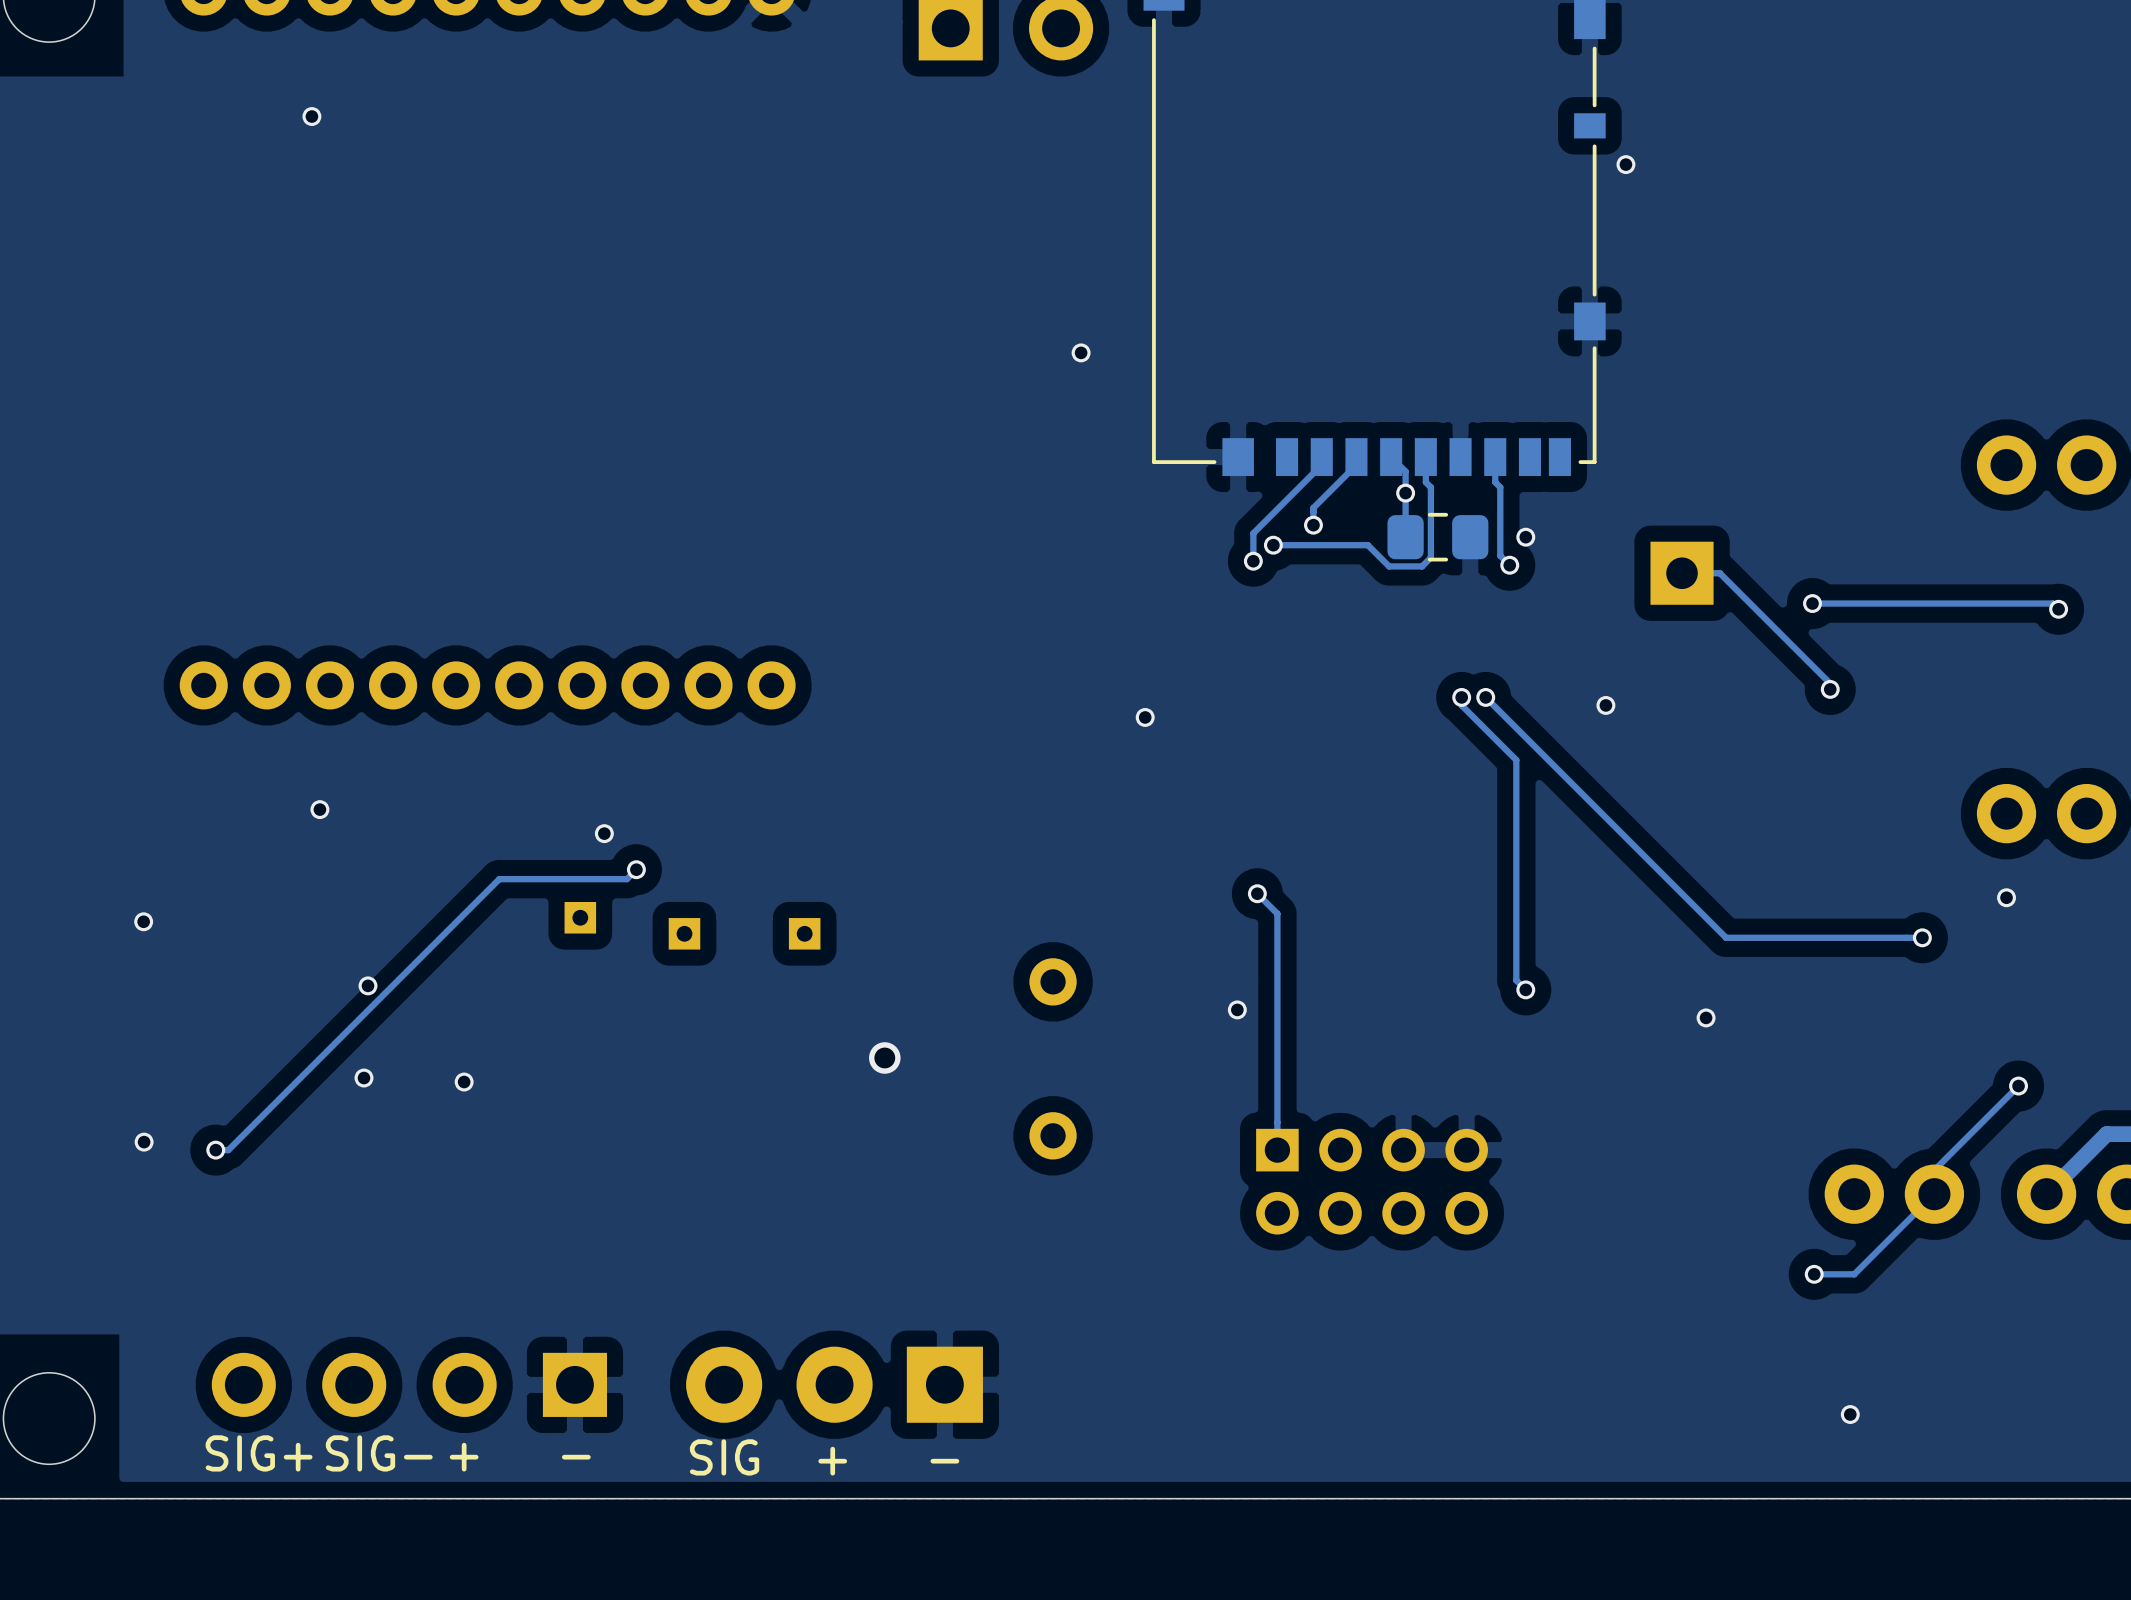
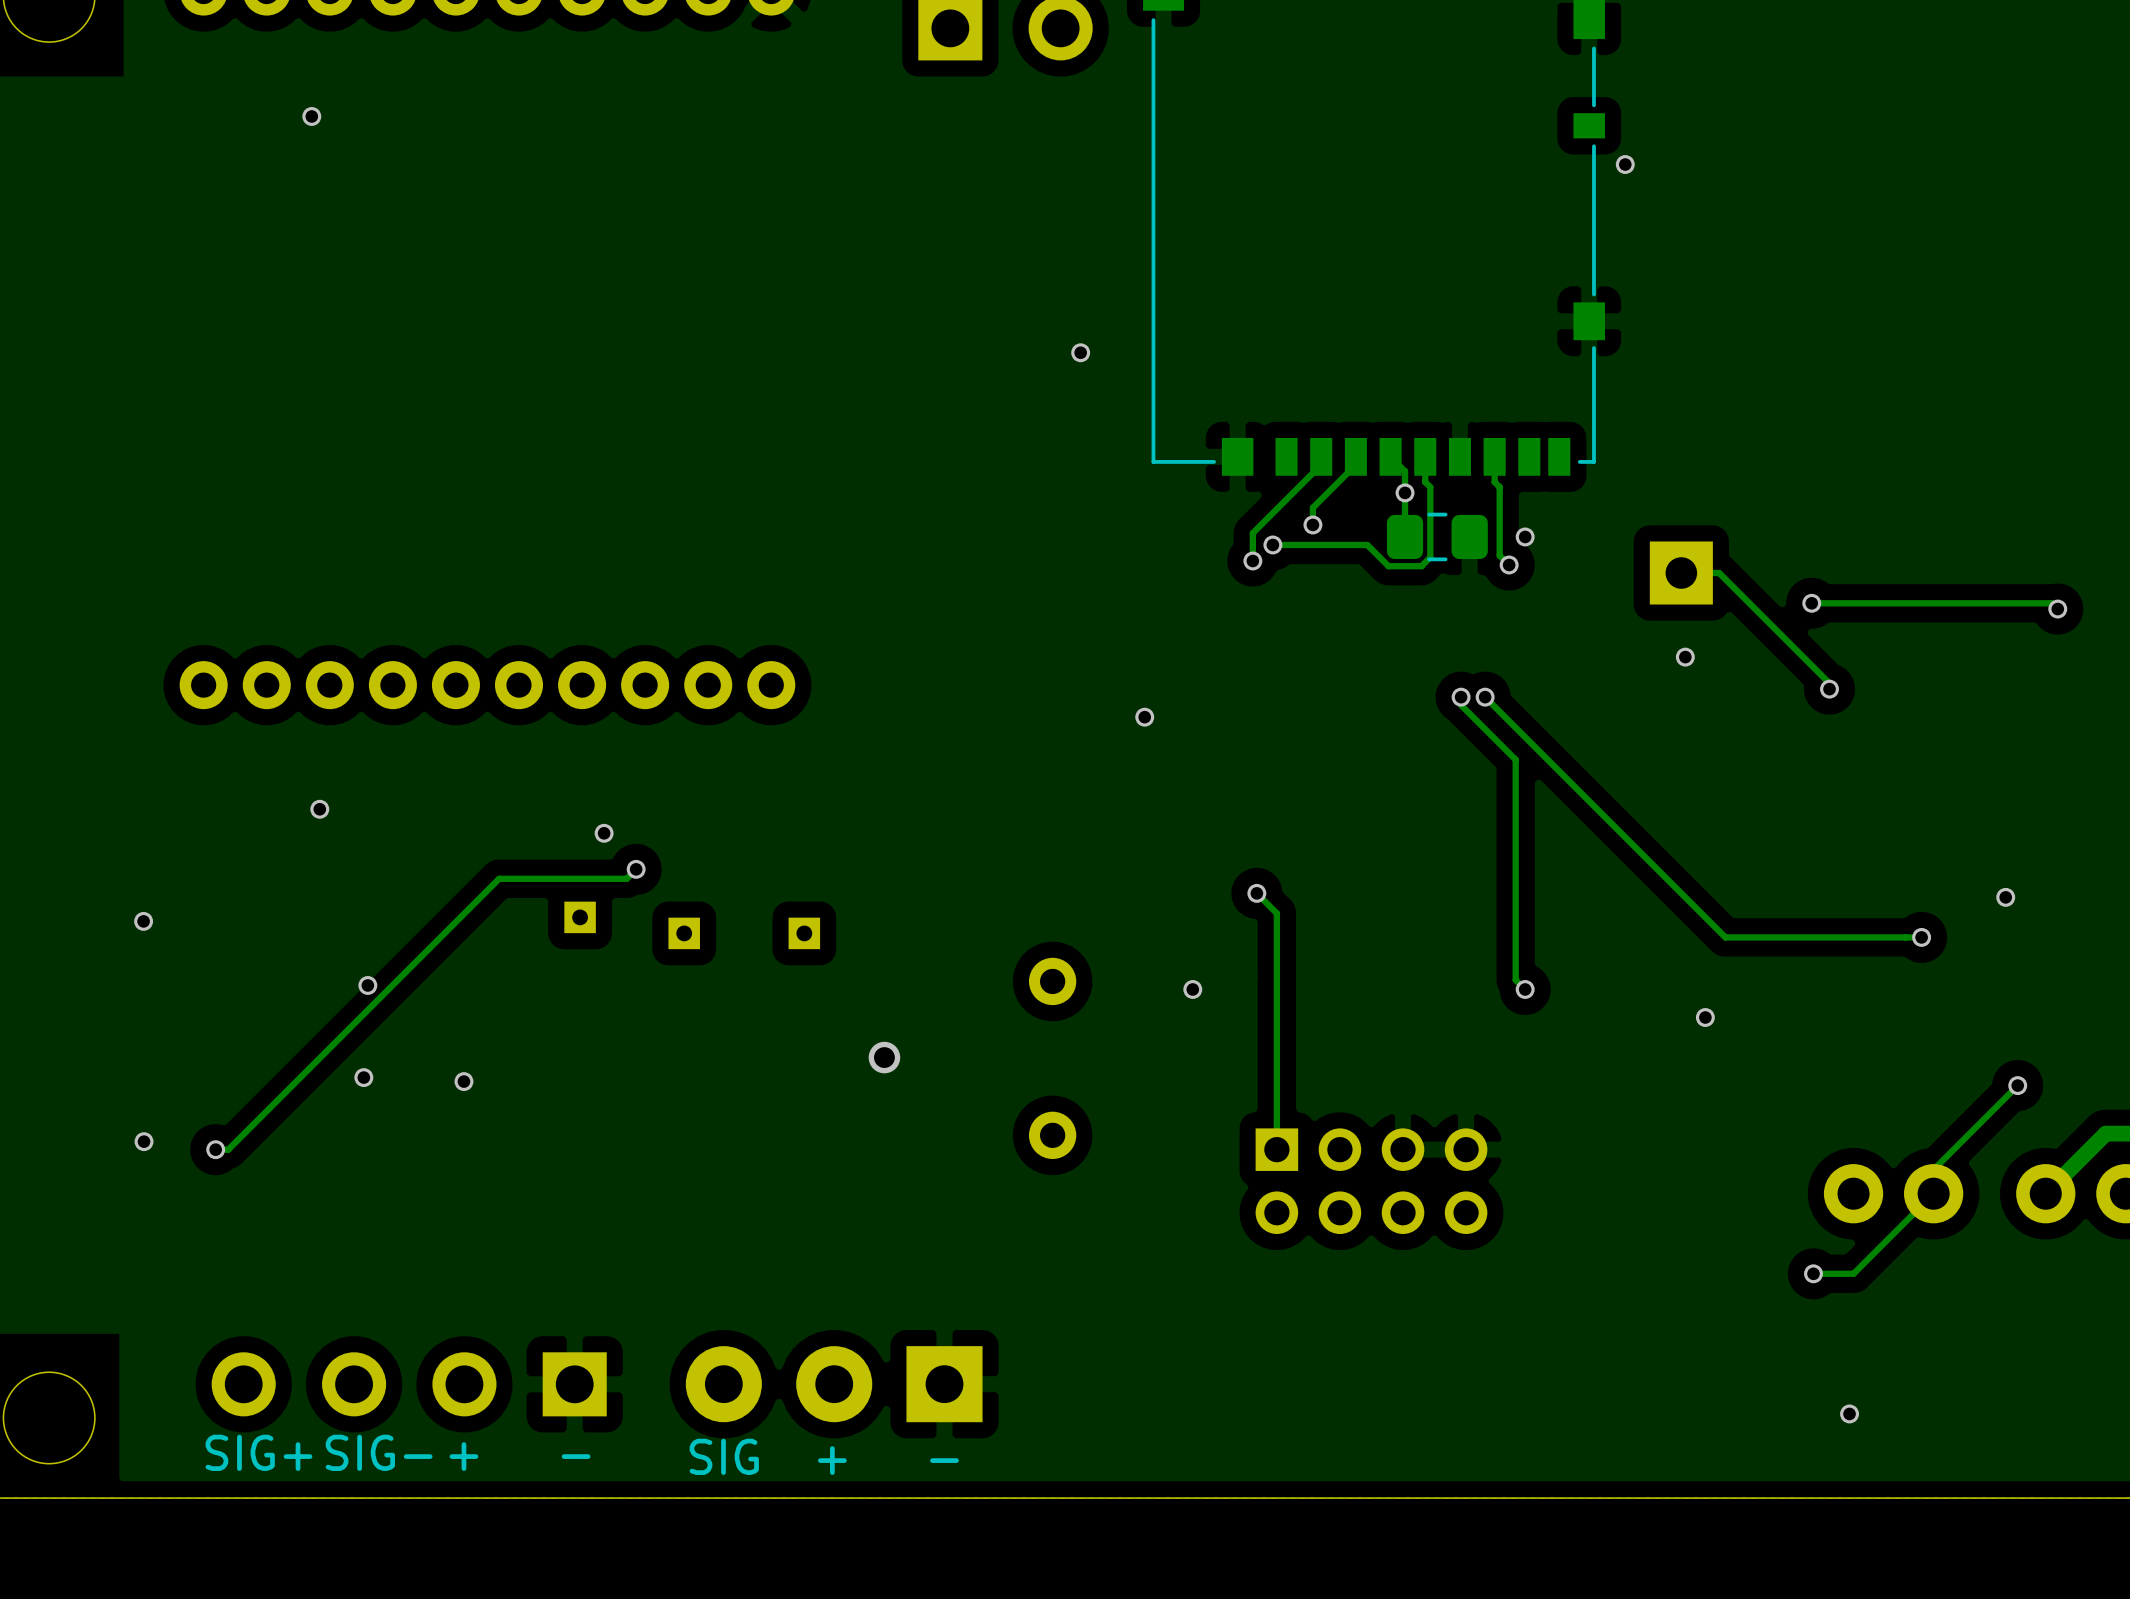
part: (2046, 465) -> none
via position: (1605, 705) -> (1685, 657)
part: (2046, 813) -> none
via position: (1237, 1009) -> (1192, 989)

